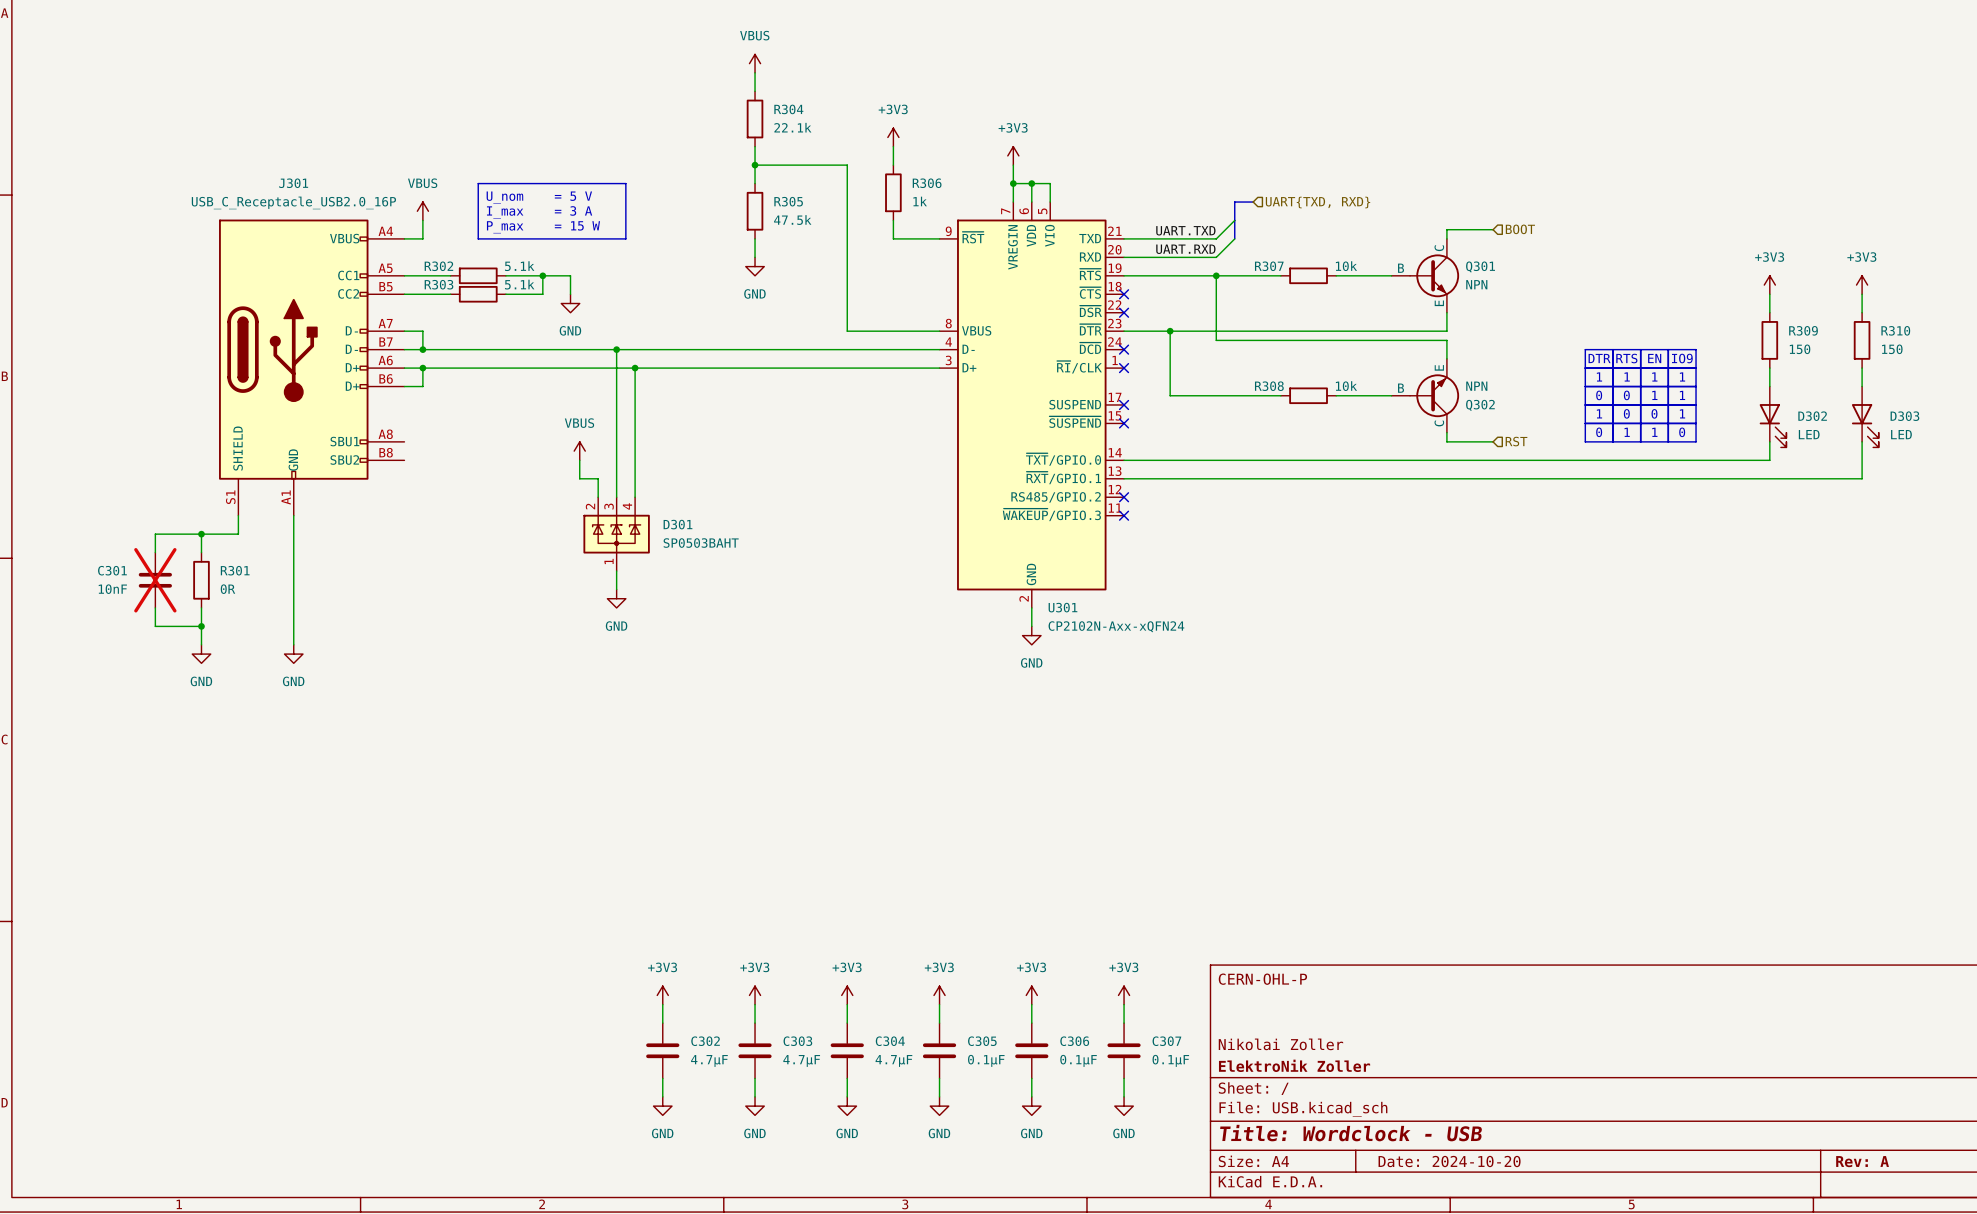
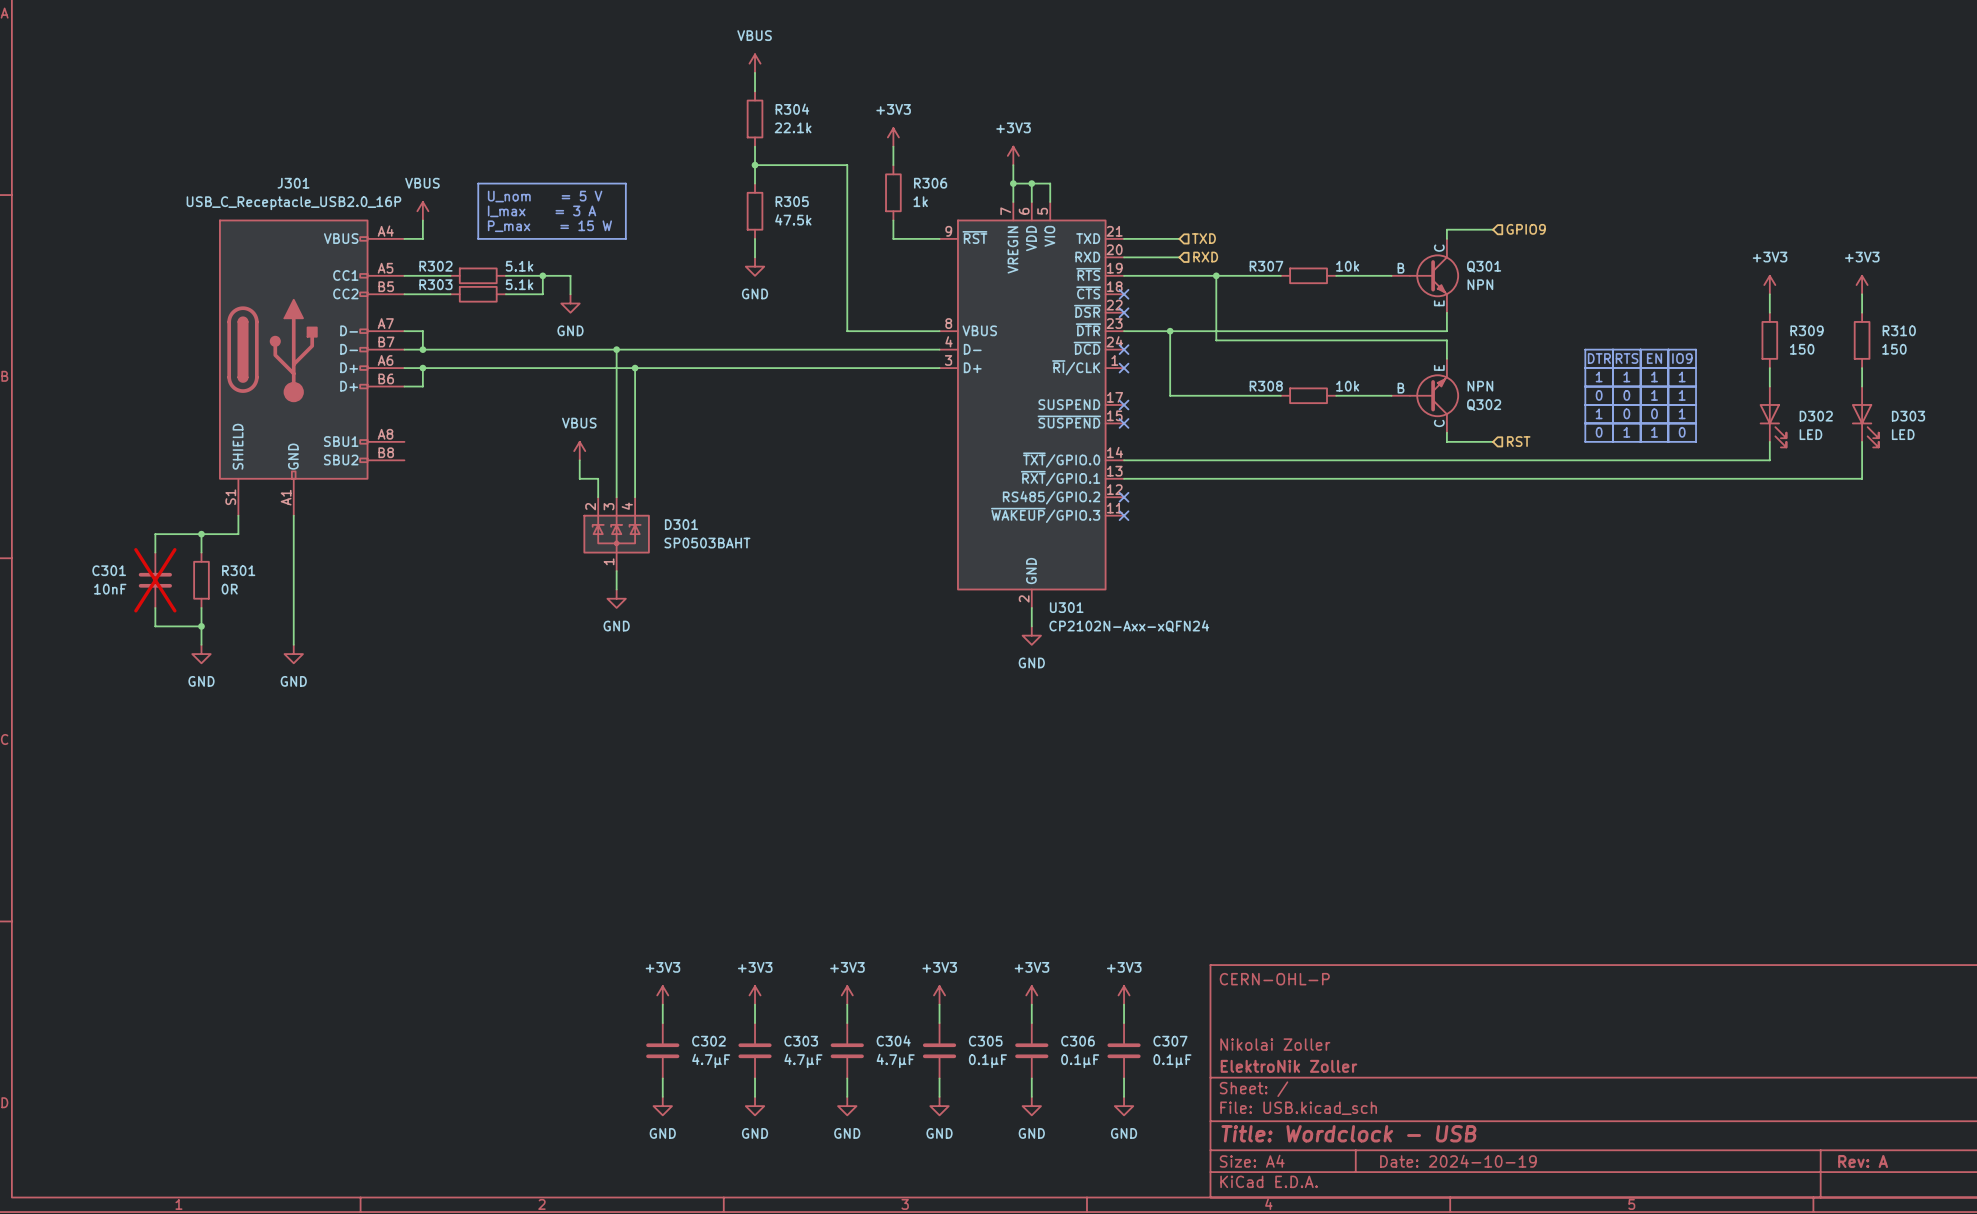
bus: (1253, 202) (1234, 202) (1234, 238) -> none
hierarchical label: UART{TXD, RXD} (1318, 202) -> none
wire: (1234, 220) (1216, 238) (1179, 238) -> none
hierarchical label: BOOT (1520, 229) -> GPIO9 (1526, 229)
label: UART.TXD (1185, 230) -> none
hierarchical label: none -> TXD (1203, 238)
wire: (1234, 238) (1216, 257) (1179, 257) -> none
label: UART.RXD (1185, 249) -> none
hierarchical label: none -> RXD (1205, 257)
title block: Date: 2024-10-20 (1449, 1161) -> Date: 2024-10-19 (1458, 1161)

